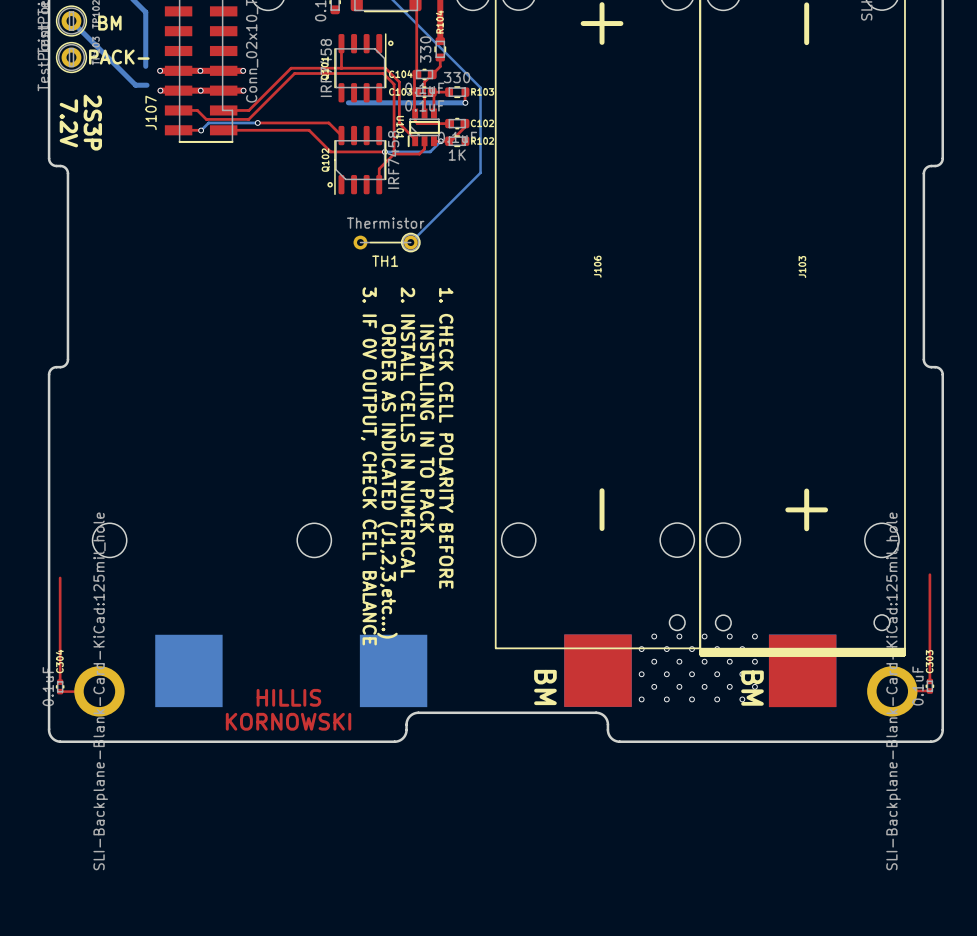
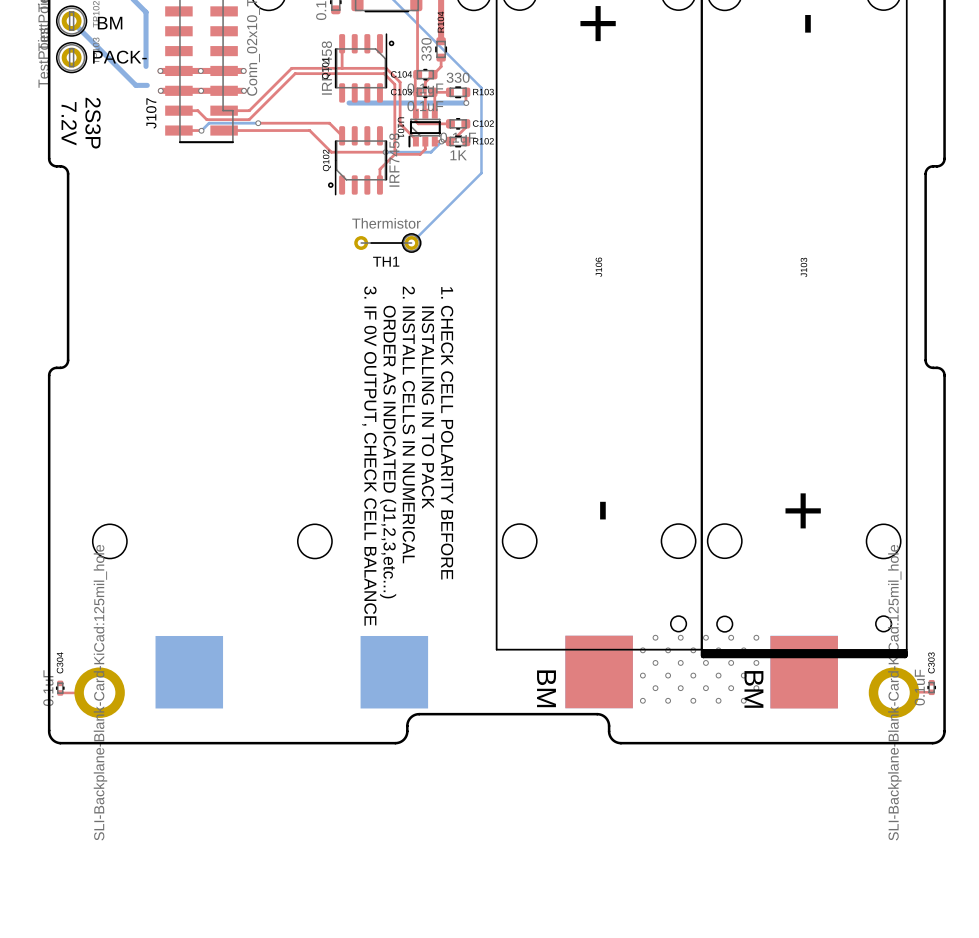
top track: (929, 574) (929, 681) -> none
top track: (60, 577) (60, 682) -> none
text: HILLIS (288, 697) -> none
text: KORNOWSKI (288, 721) -> none

